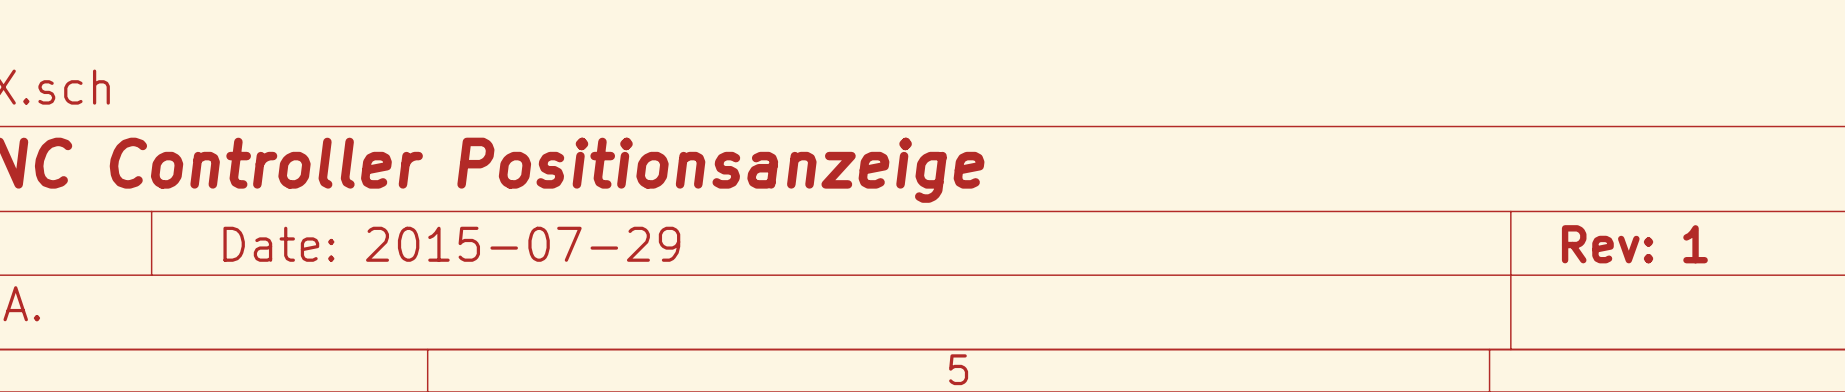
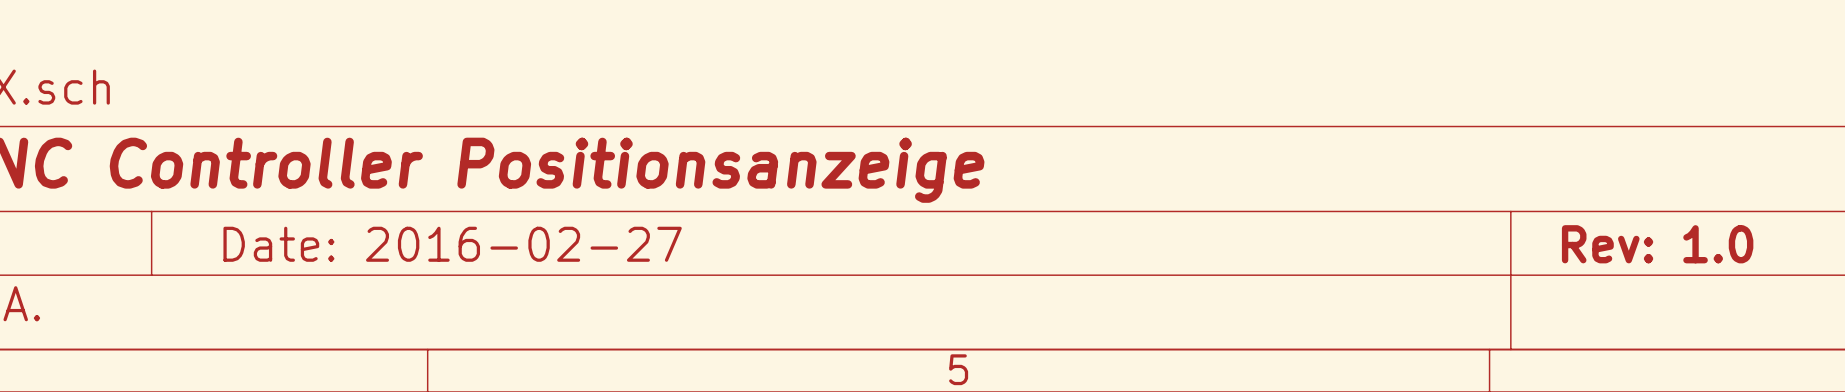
title block: Date: 2015-07-29 (451, 244) -> Date: 2016-02-27 (452, 244)
title block: Rev: 1 (1634, 244) -> Rev: 1.0 (1657, 244)

